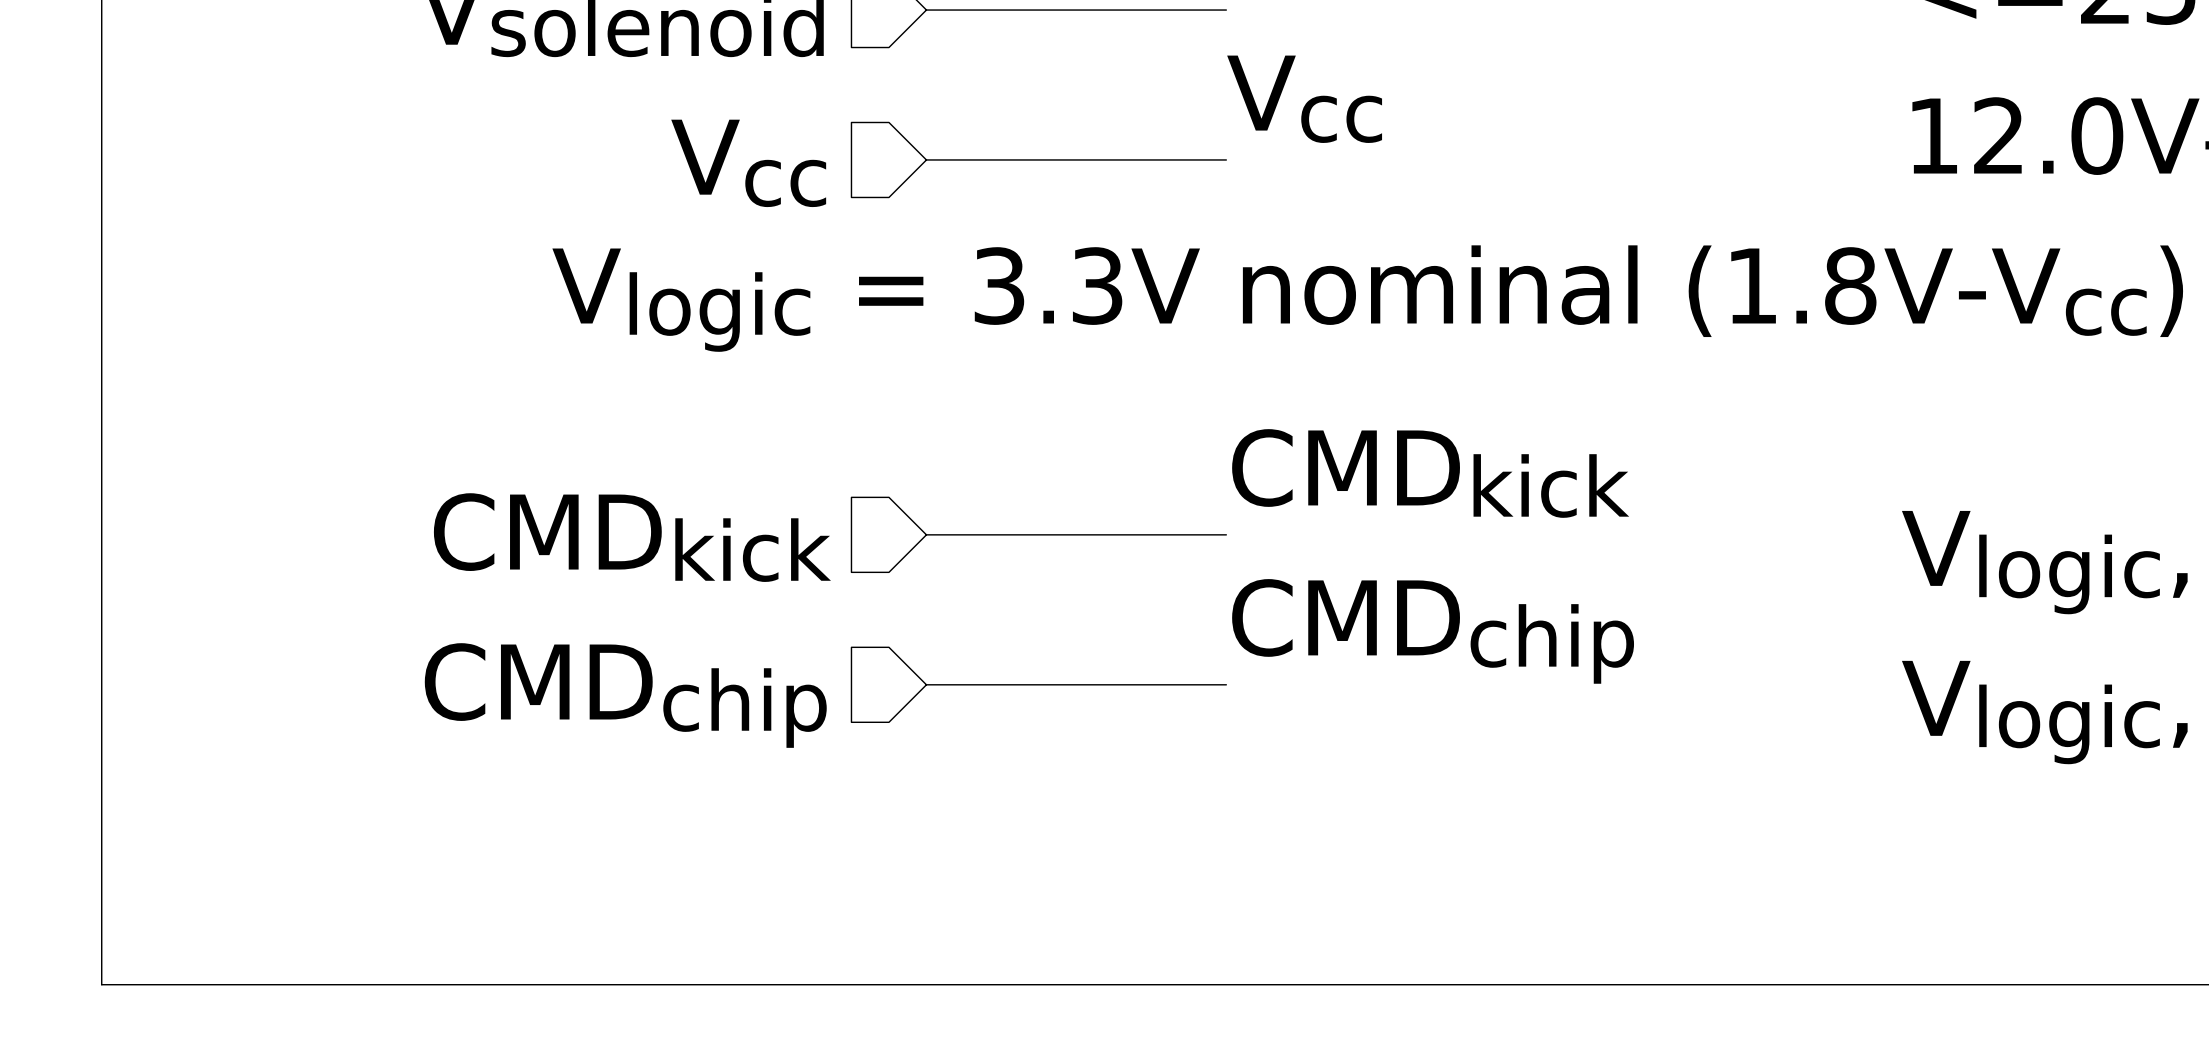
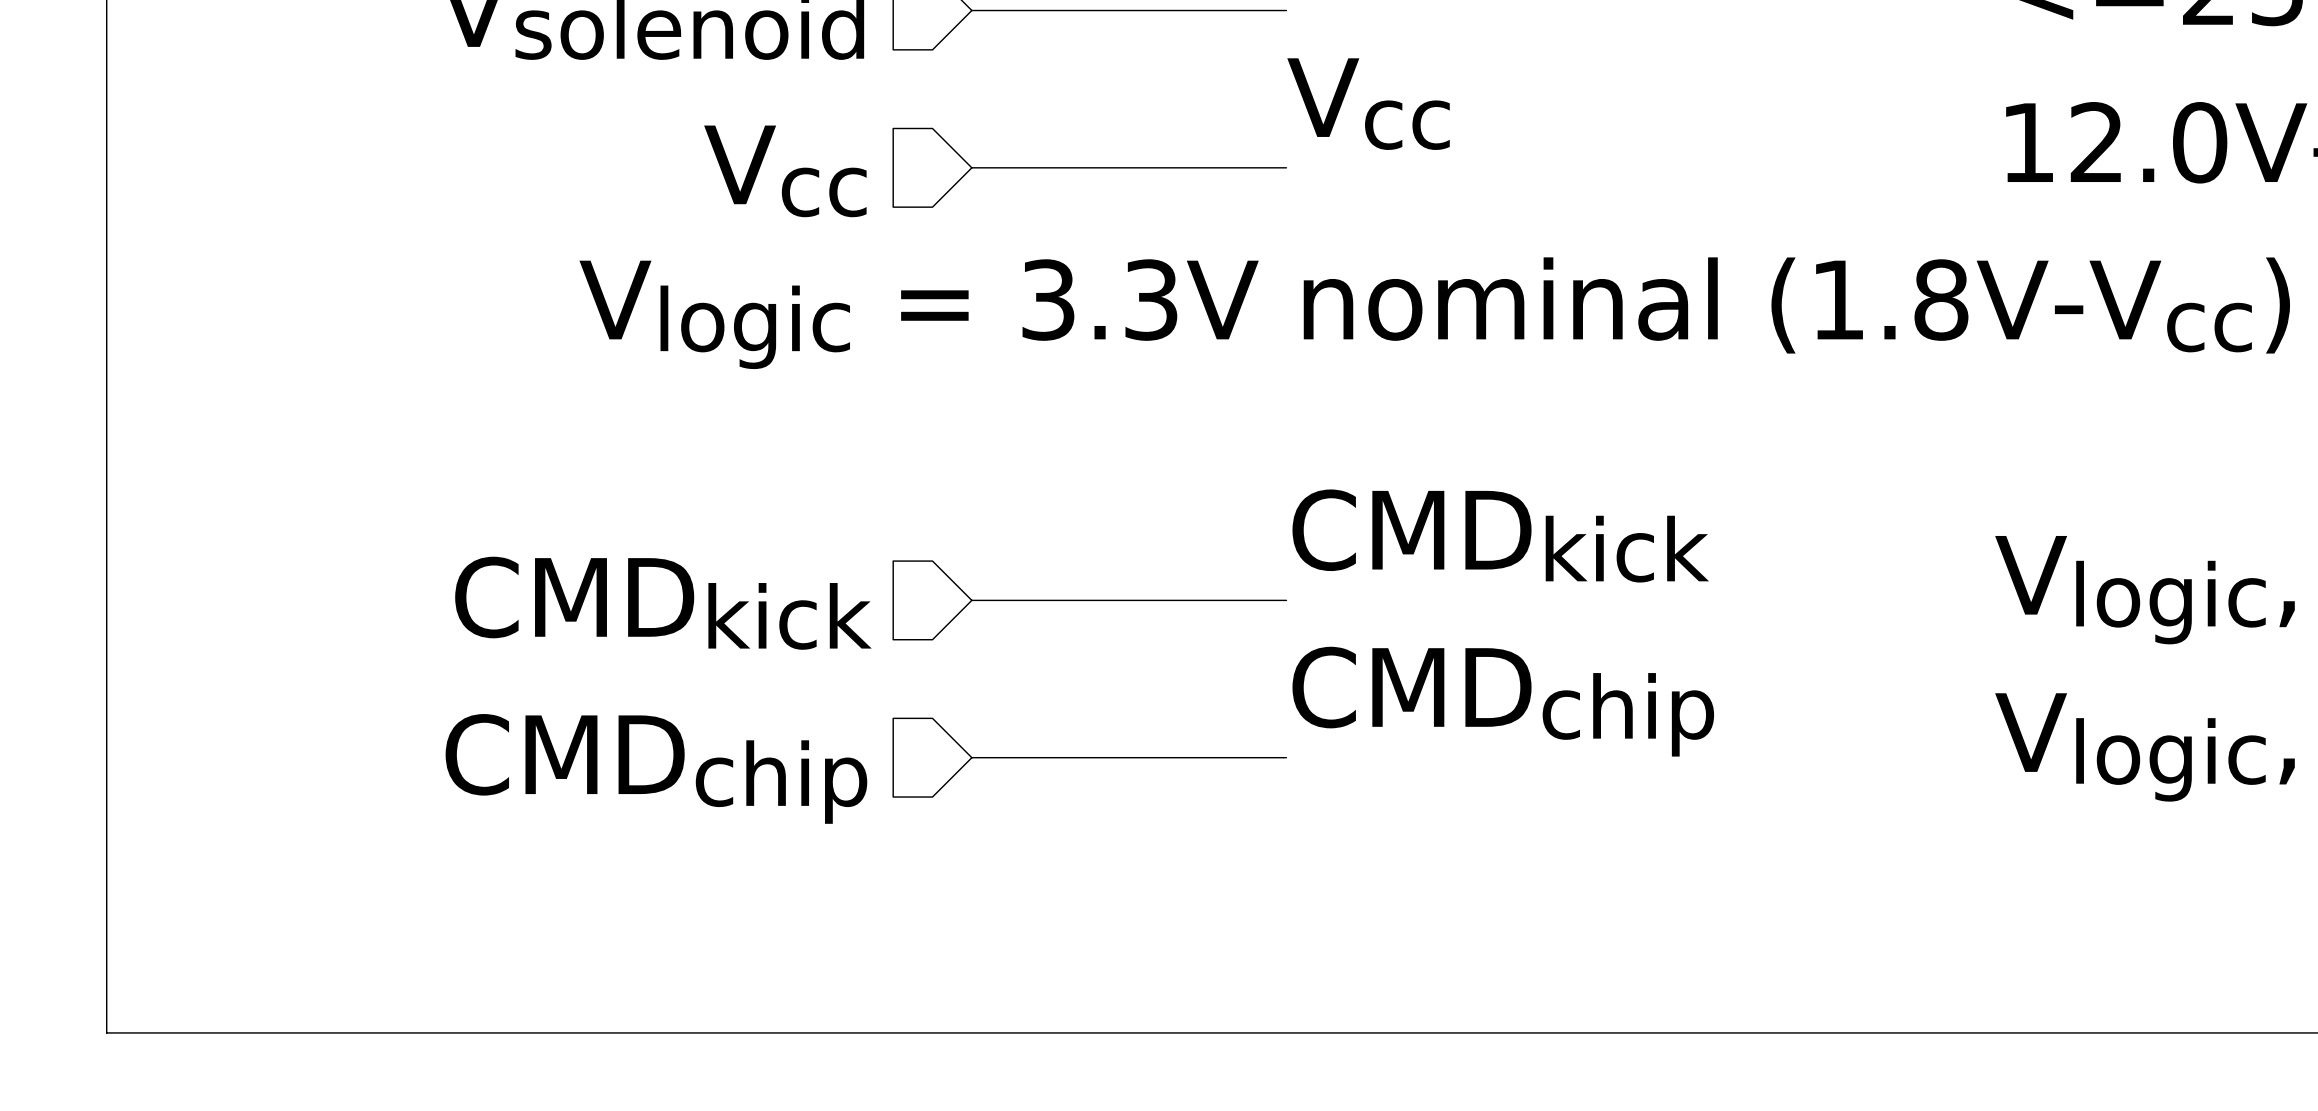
label position: CMDkick (1430, 473) -> CMDkick (1500, 536)
wire: (926, 534) (1226, 534) -> (971, 600) (1286, 600)
hierarchical label position: CMDkick (632, 537) -> CMDkick (663, 603)
label position: CMDchip (1433, 631) -> CMDchip (1503, 701)
wire: (926, 684) (1226, 684) -> (971, 757) (1286, 757)
hierarchical label position: CMDchip (625, 695) -> CMDchip (656, 768)

